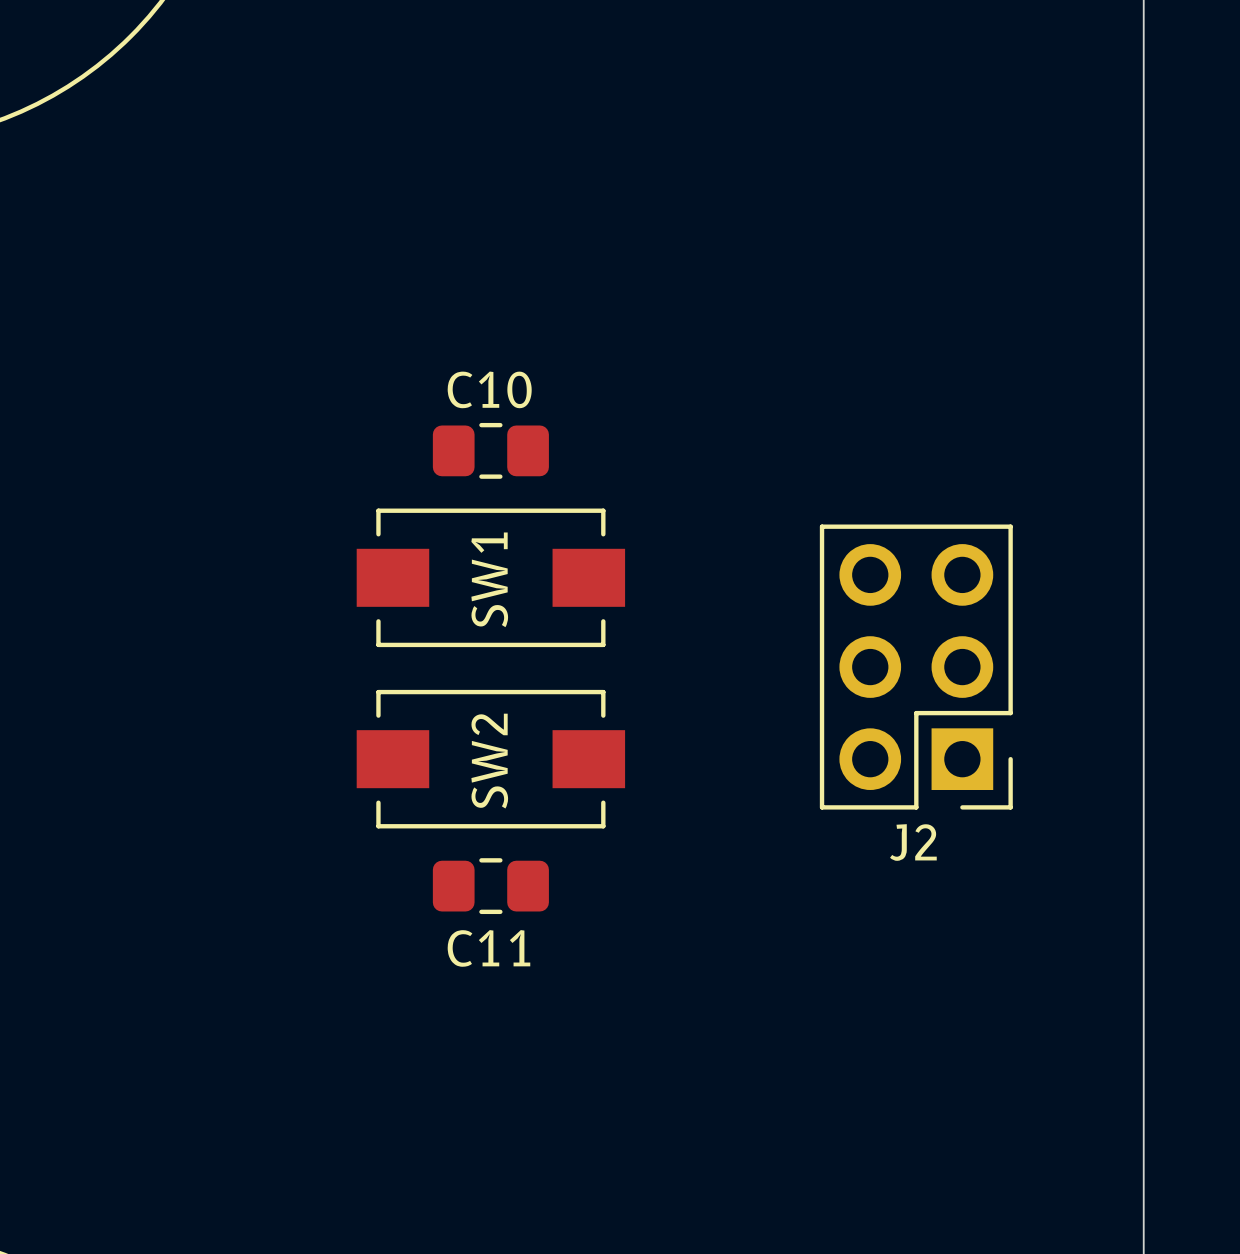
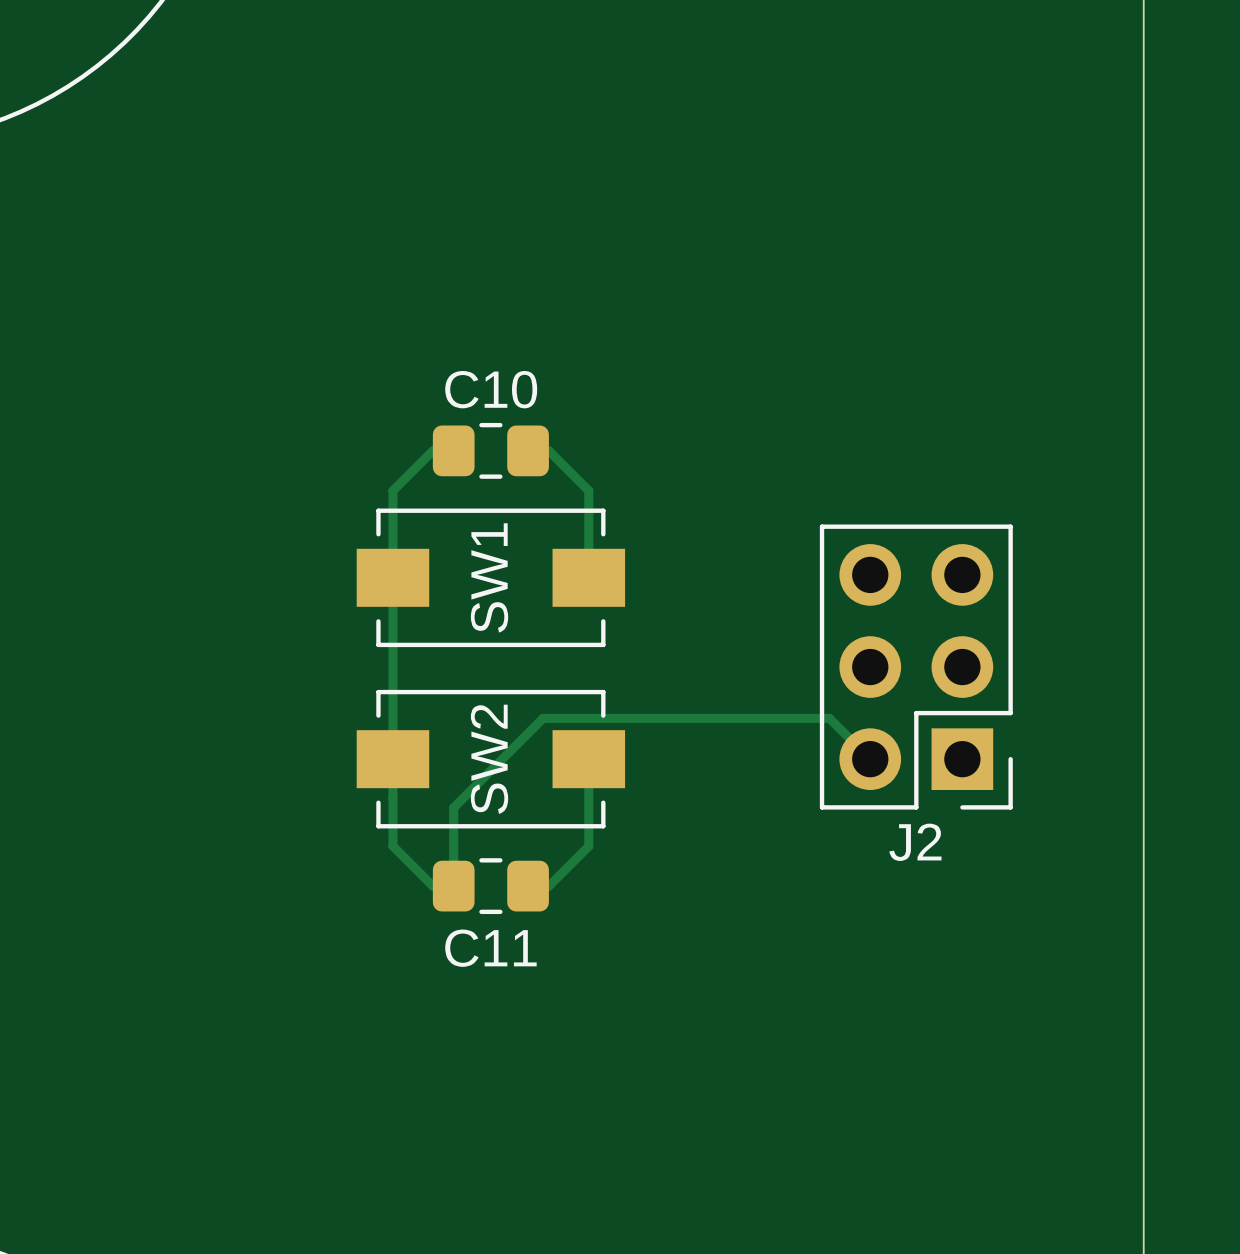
track: none -> (453, 450) (432, 450) (392, 490) (392, 846) (432, 886) (453, 886) (453, 807) (543, 718) (829, 718) (870, 759)
track: none -> (528, 450) (548, 450) (588, 490) (588, 577)
track: none -> (588, 759) (588, 846) (548, 886) (528, 886)

